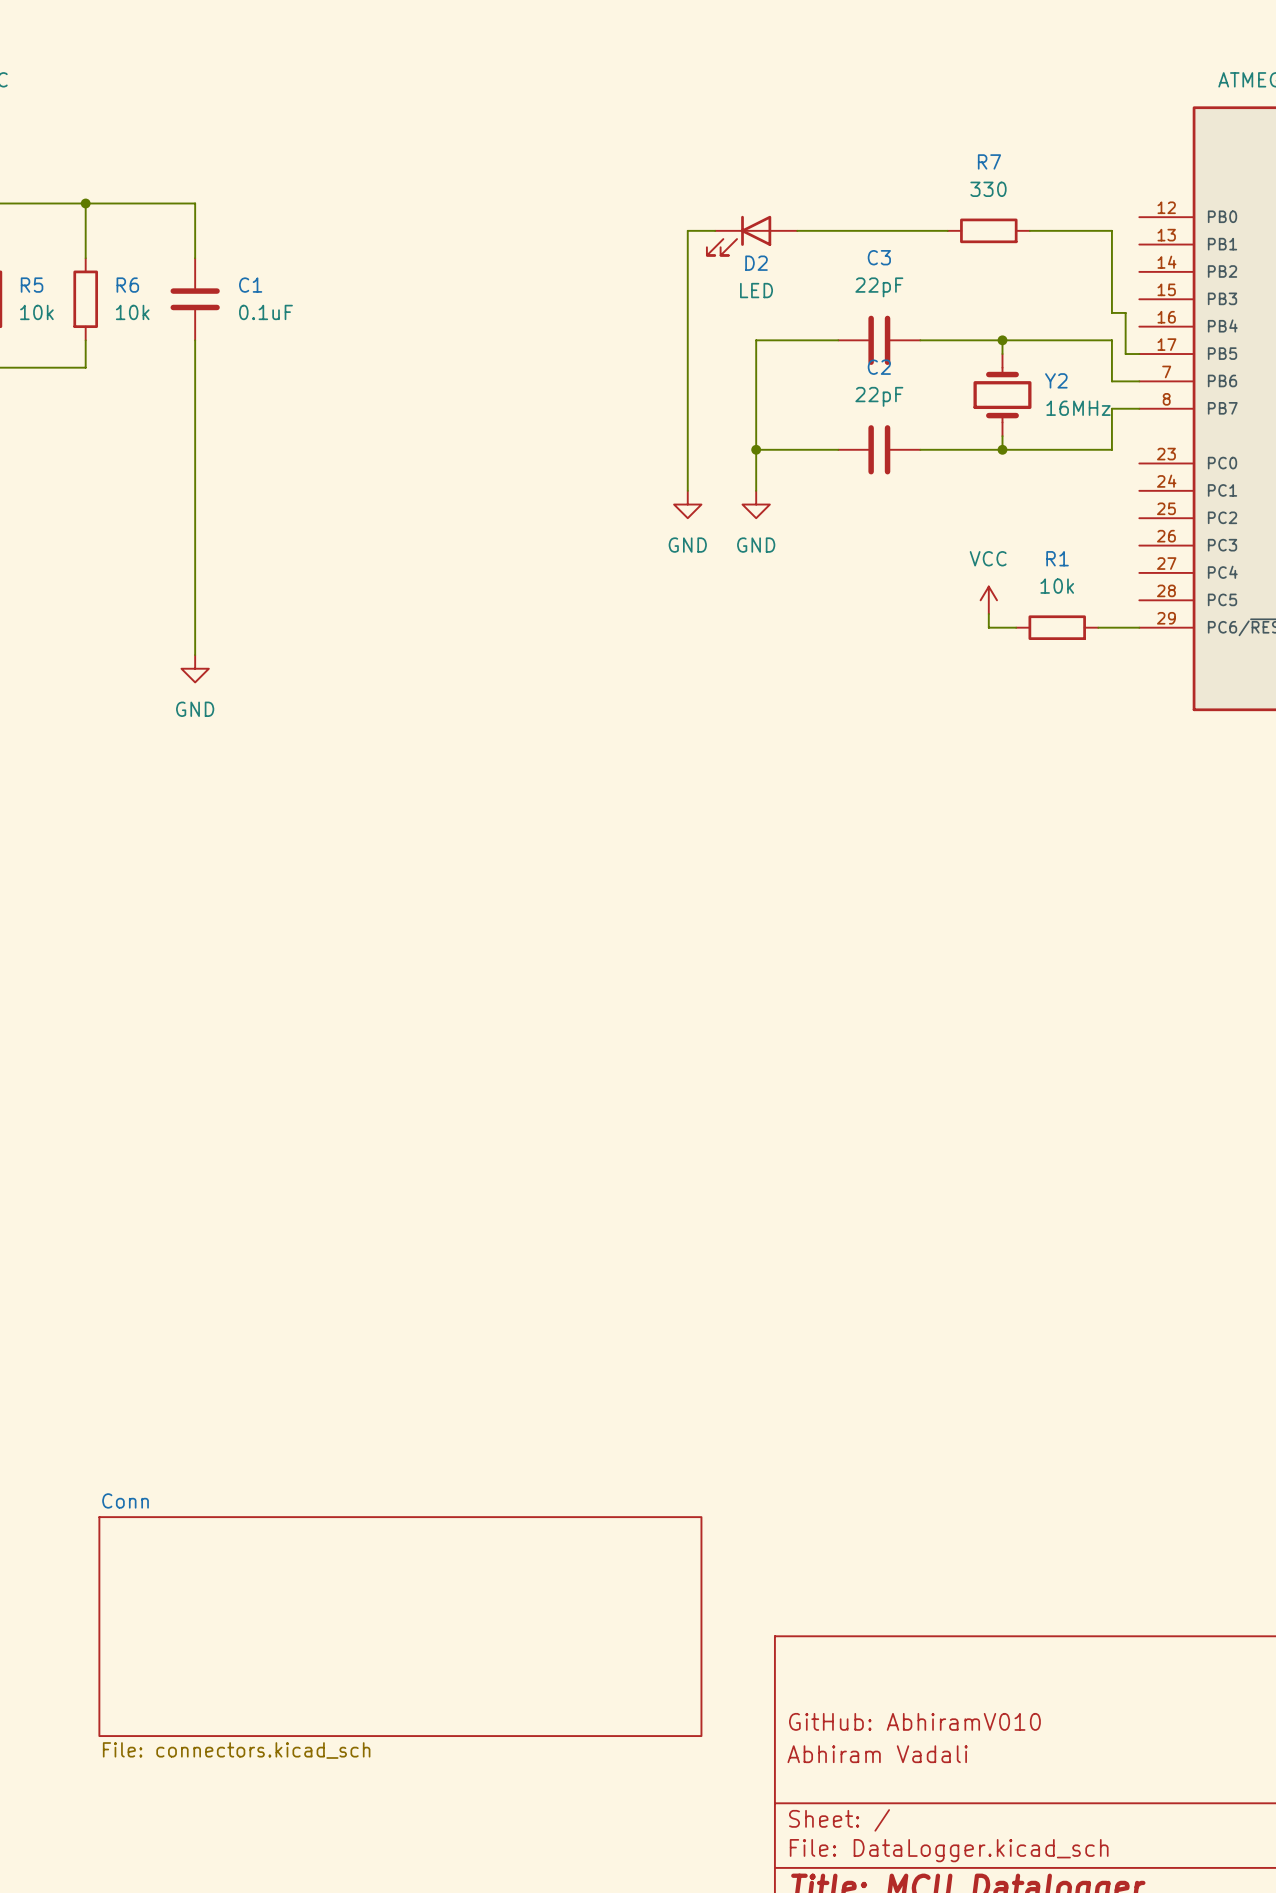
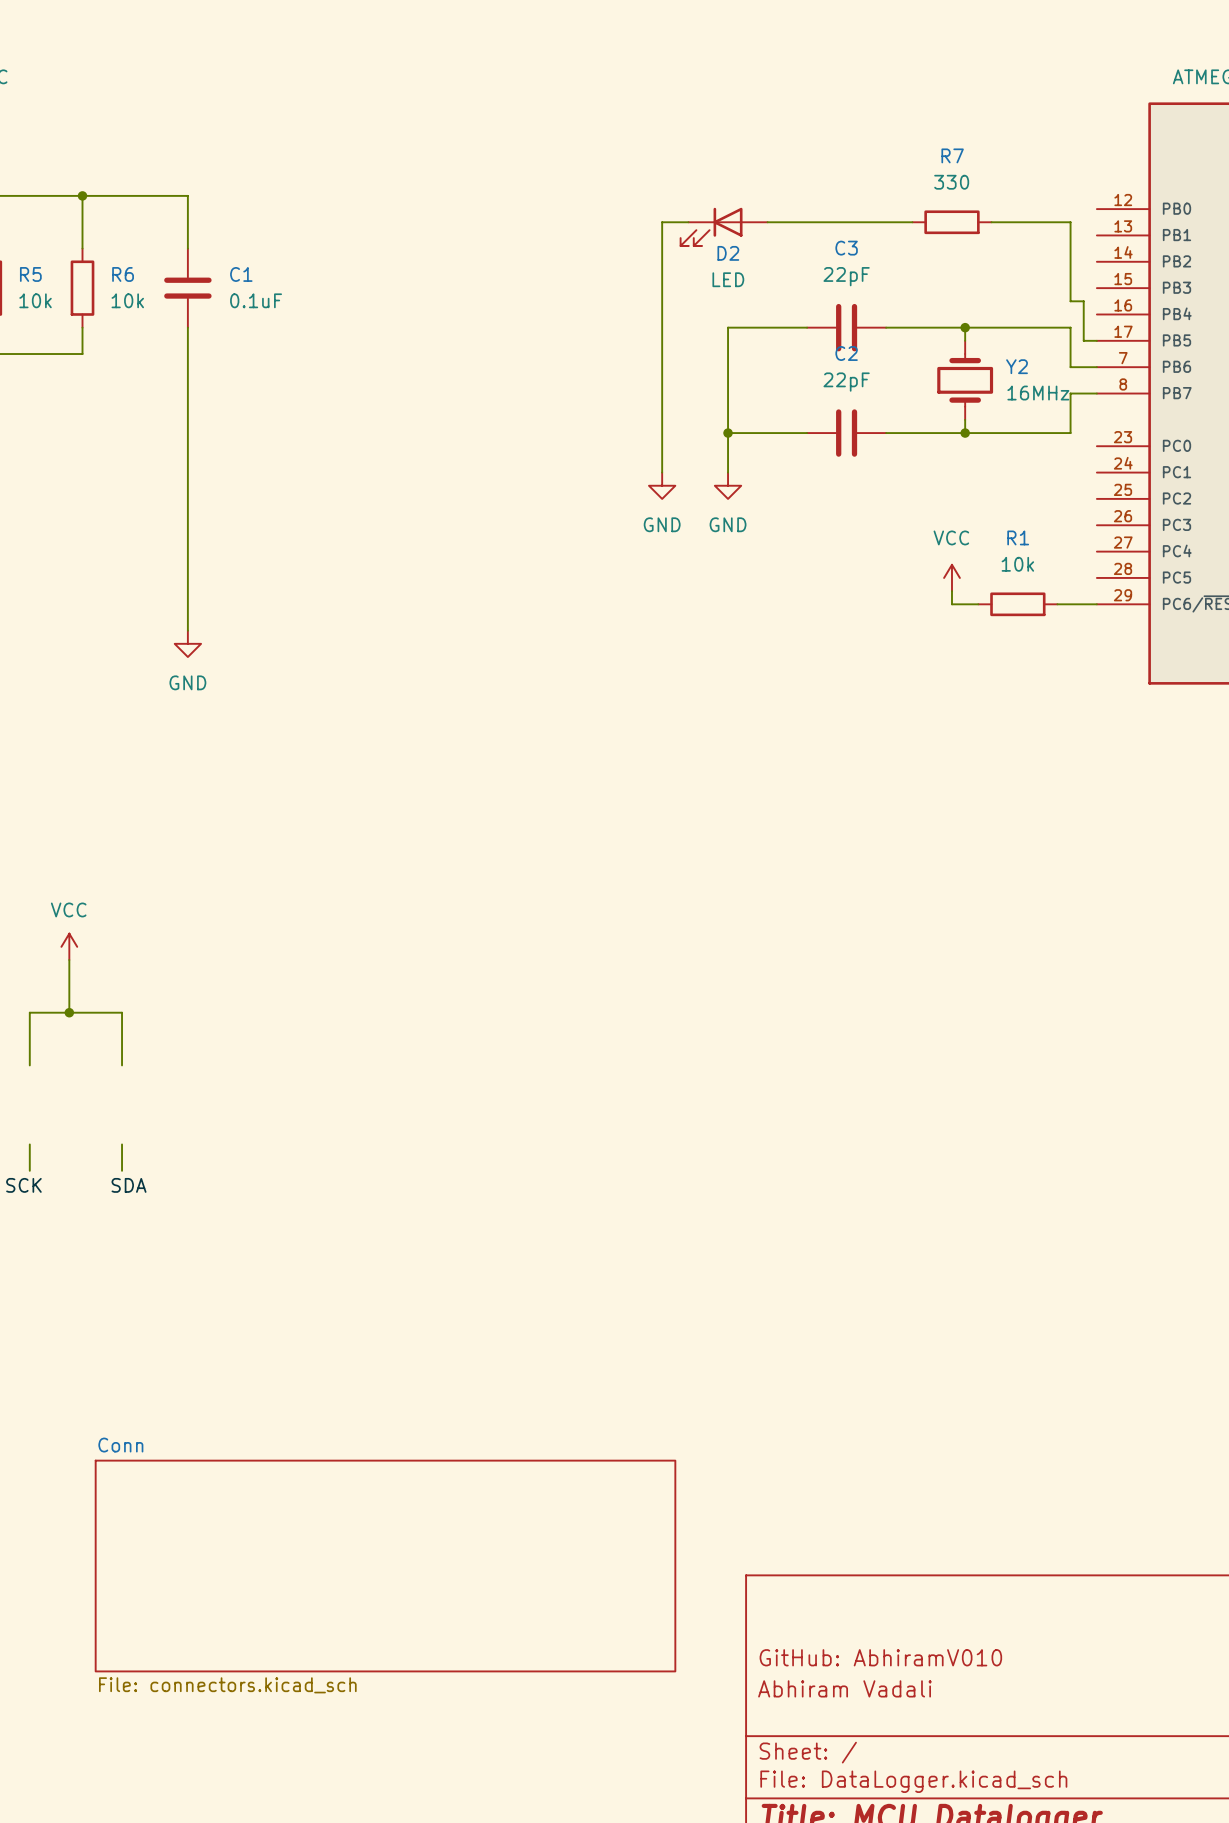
power symbol: none -> VCC (69, 946)
wire: none -> (69, 960) (69, 1012)
junction: none -> (69, 1012)
wire: none -> (29, 1065) (29, 1012) (122, 1012) (122, 1065)
wire: none -> (29, 1144) (29, 1170)
wire: none -> (122, 1144) (122, 1170)
label: none -> SCK (23, 1185)
label: none -> SDA (129, 1185)

